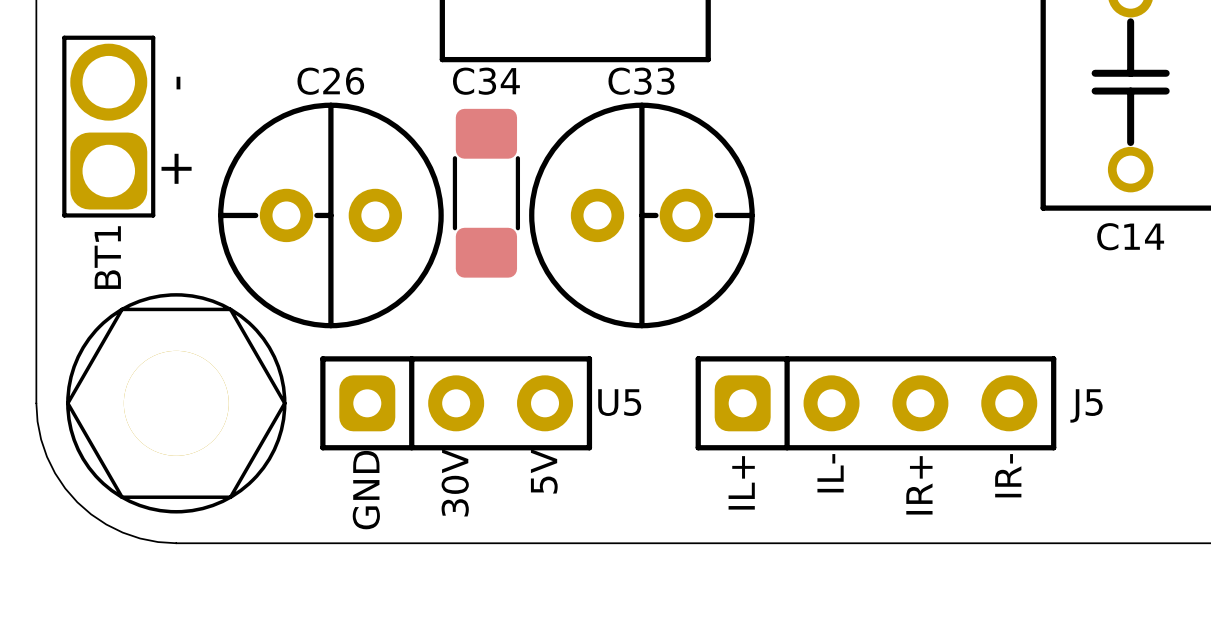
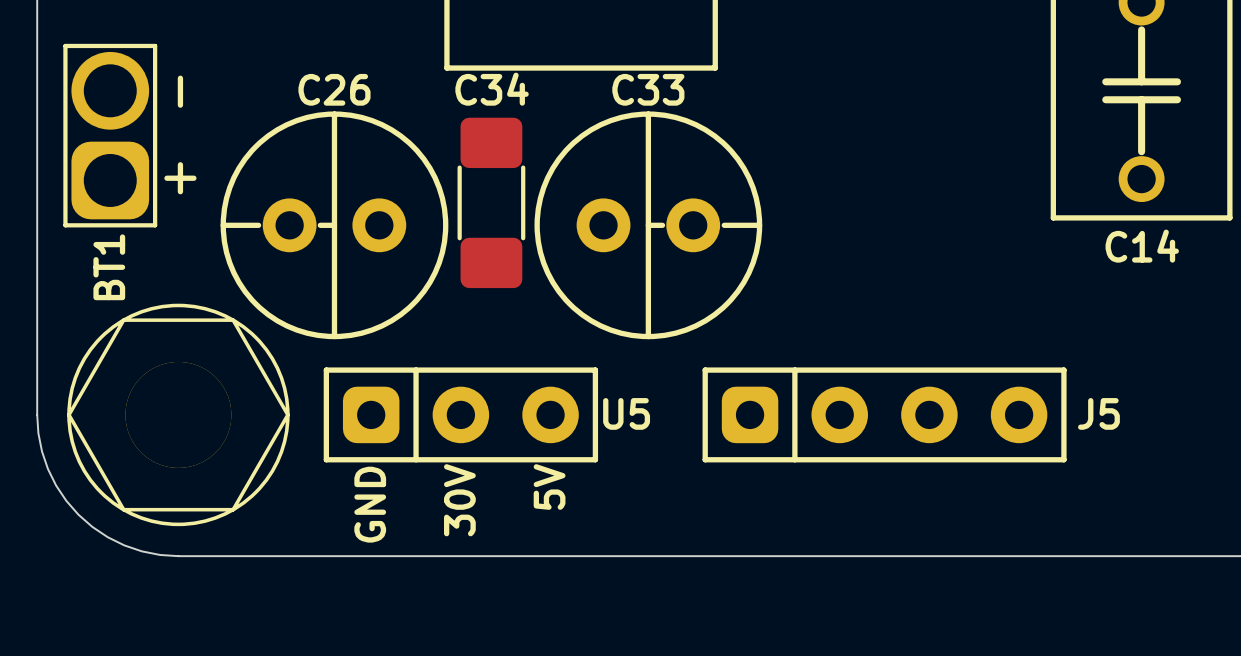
text: IL- (830, 473) -> none
text: IR- (1008, 475) -> none
text: IL+ (741, 482) -> none
text: IR+ (919, 485) -> none

